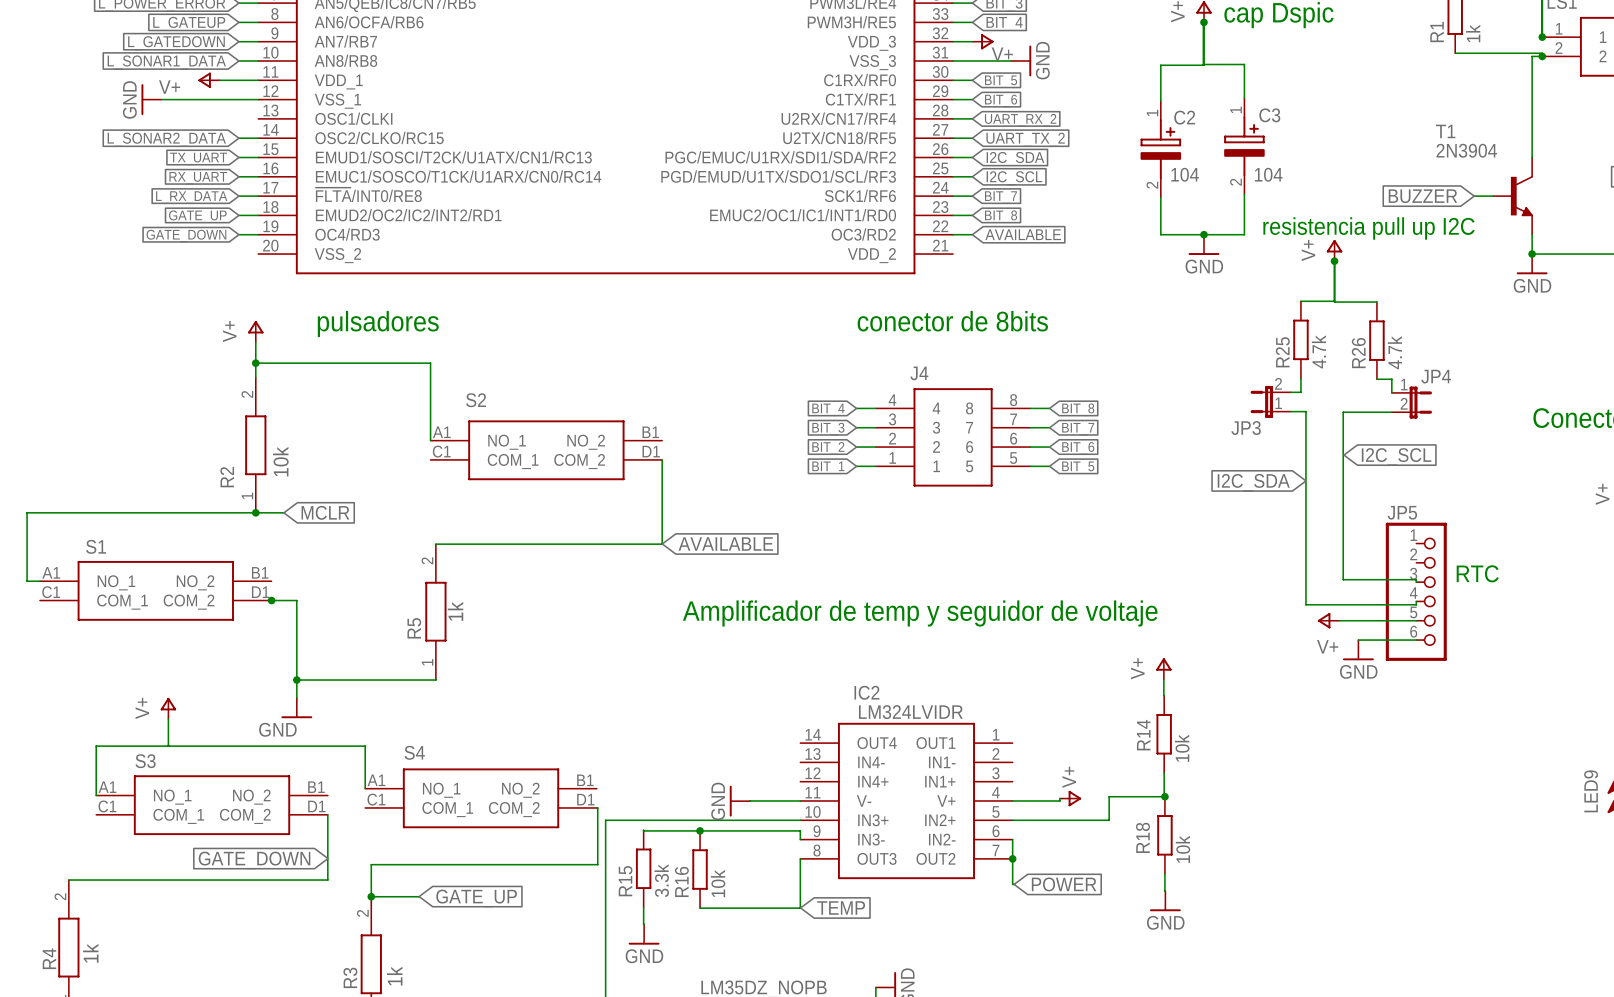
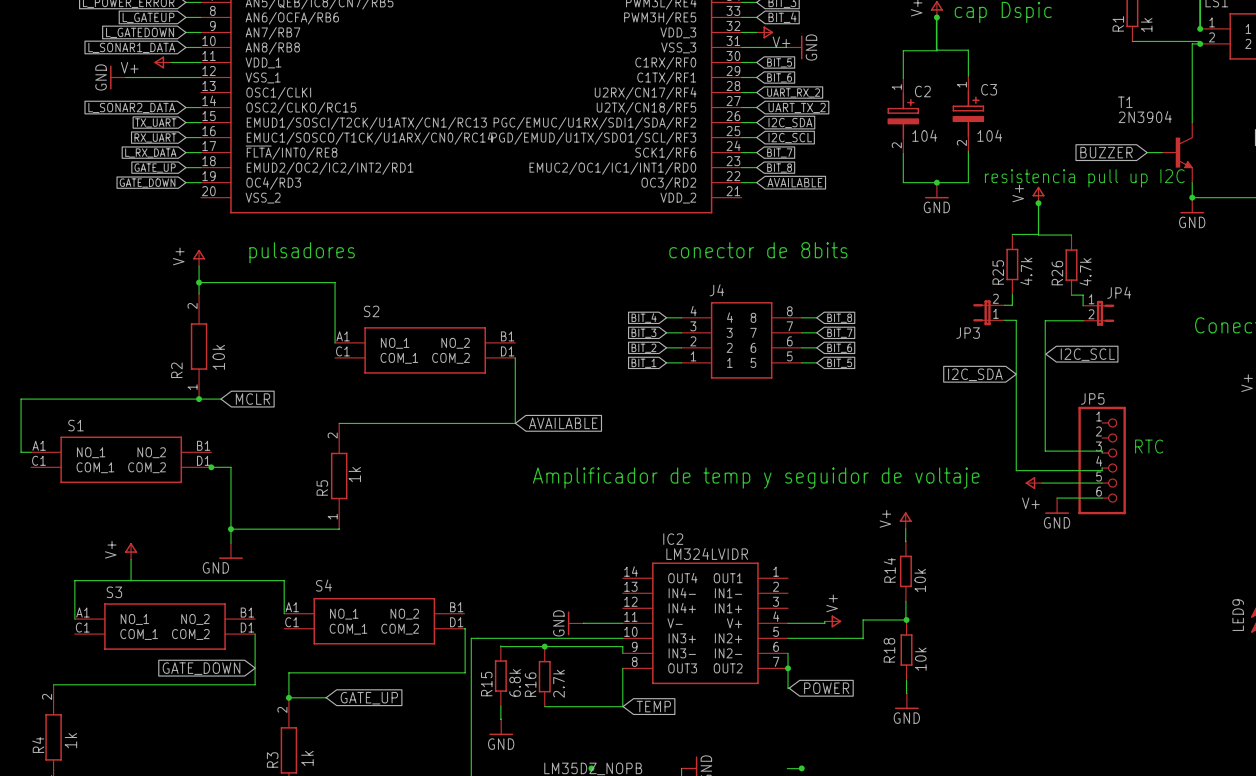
R15 value: 3.3k (661, 880) -> 6.8k (515, 682)
R16 value: 10k (718, 883) -> 2.7k (559, 683)
junction: none -> (591, 768)
wire: none -> (787, 768) (801, 768)
junction: none -> (801, 768)

